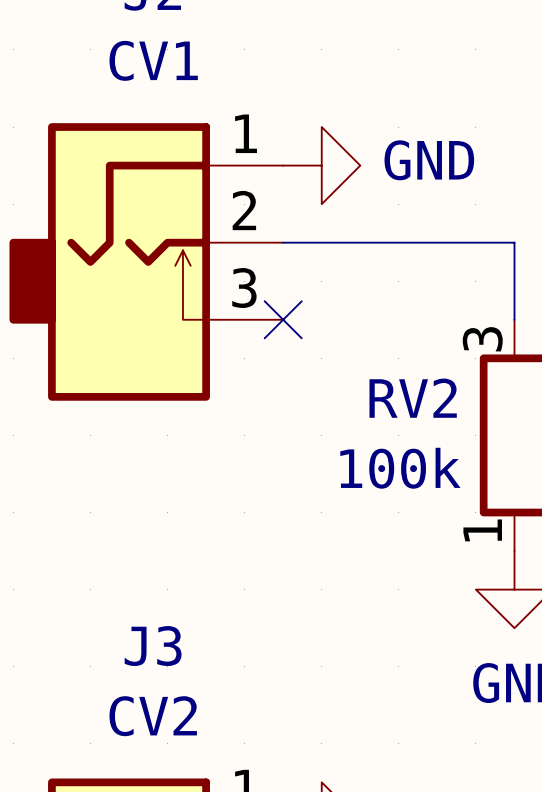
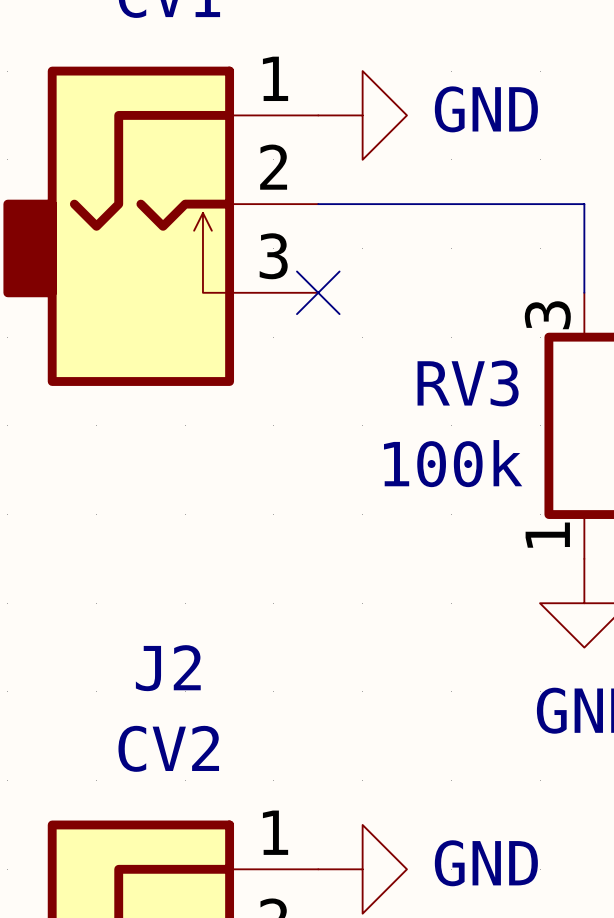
RV2 name: RV2 (413, 398) -> RV3 (468, 383)
J3 name: J3 (153, 646) -> J2 (168, 668)

